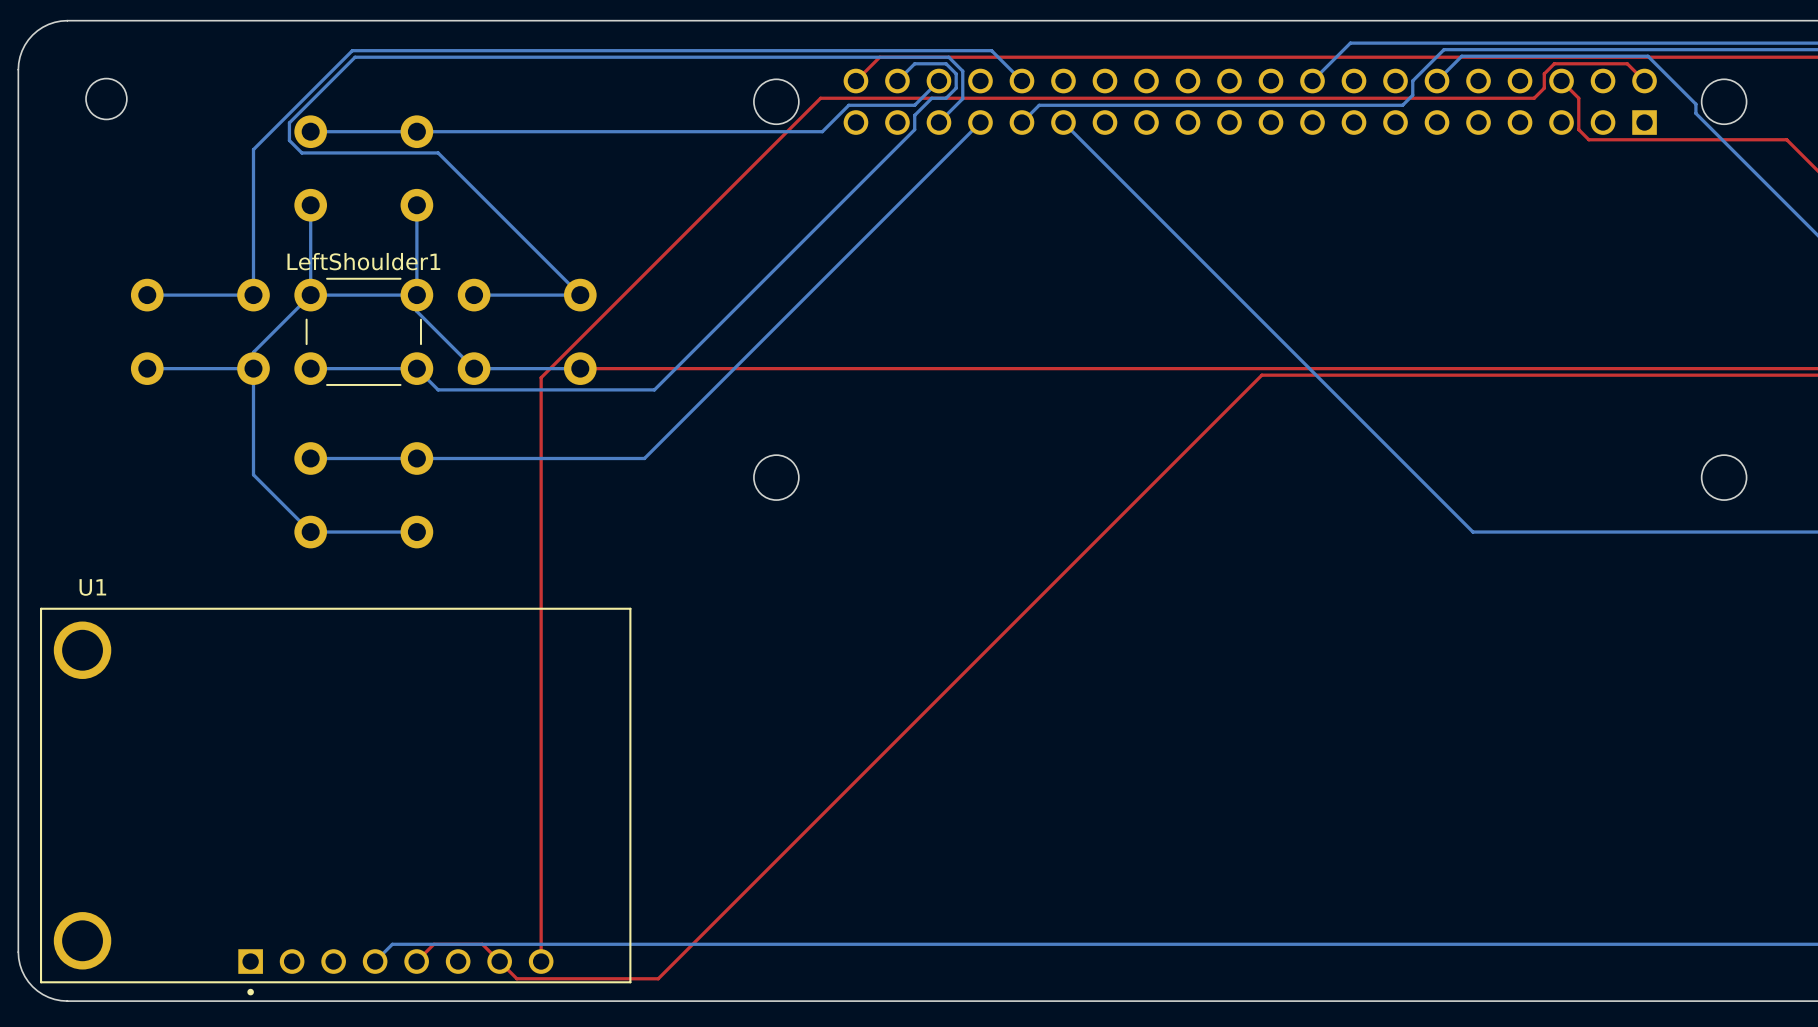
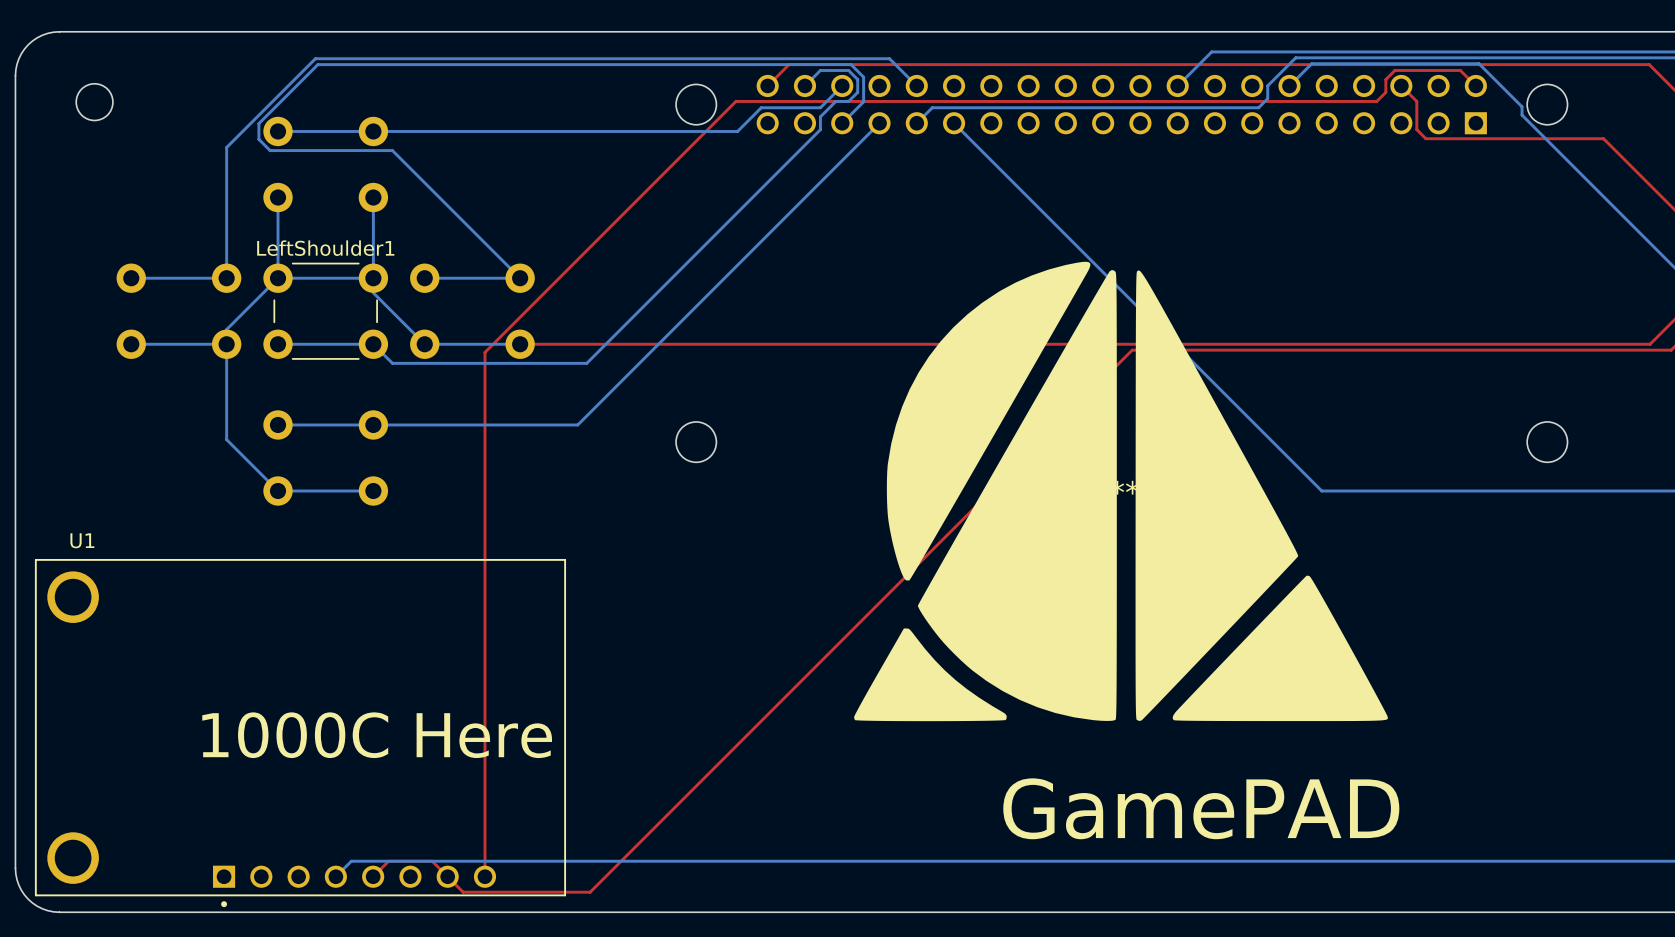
part: none -> (1121, 491)
text: none -> 1000C Here (377, 735)
text: none -> GamePAD (1201, 808)

